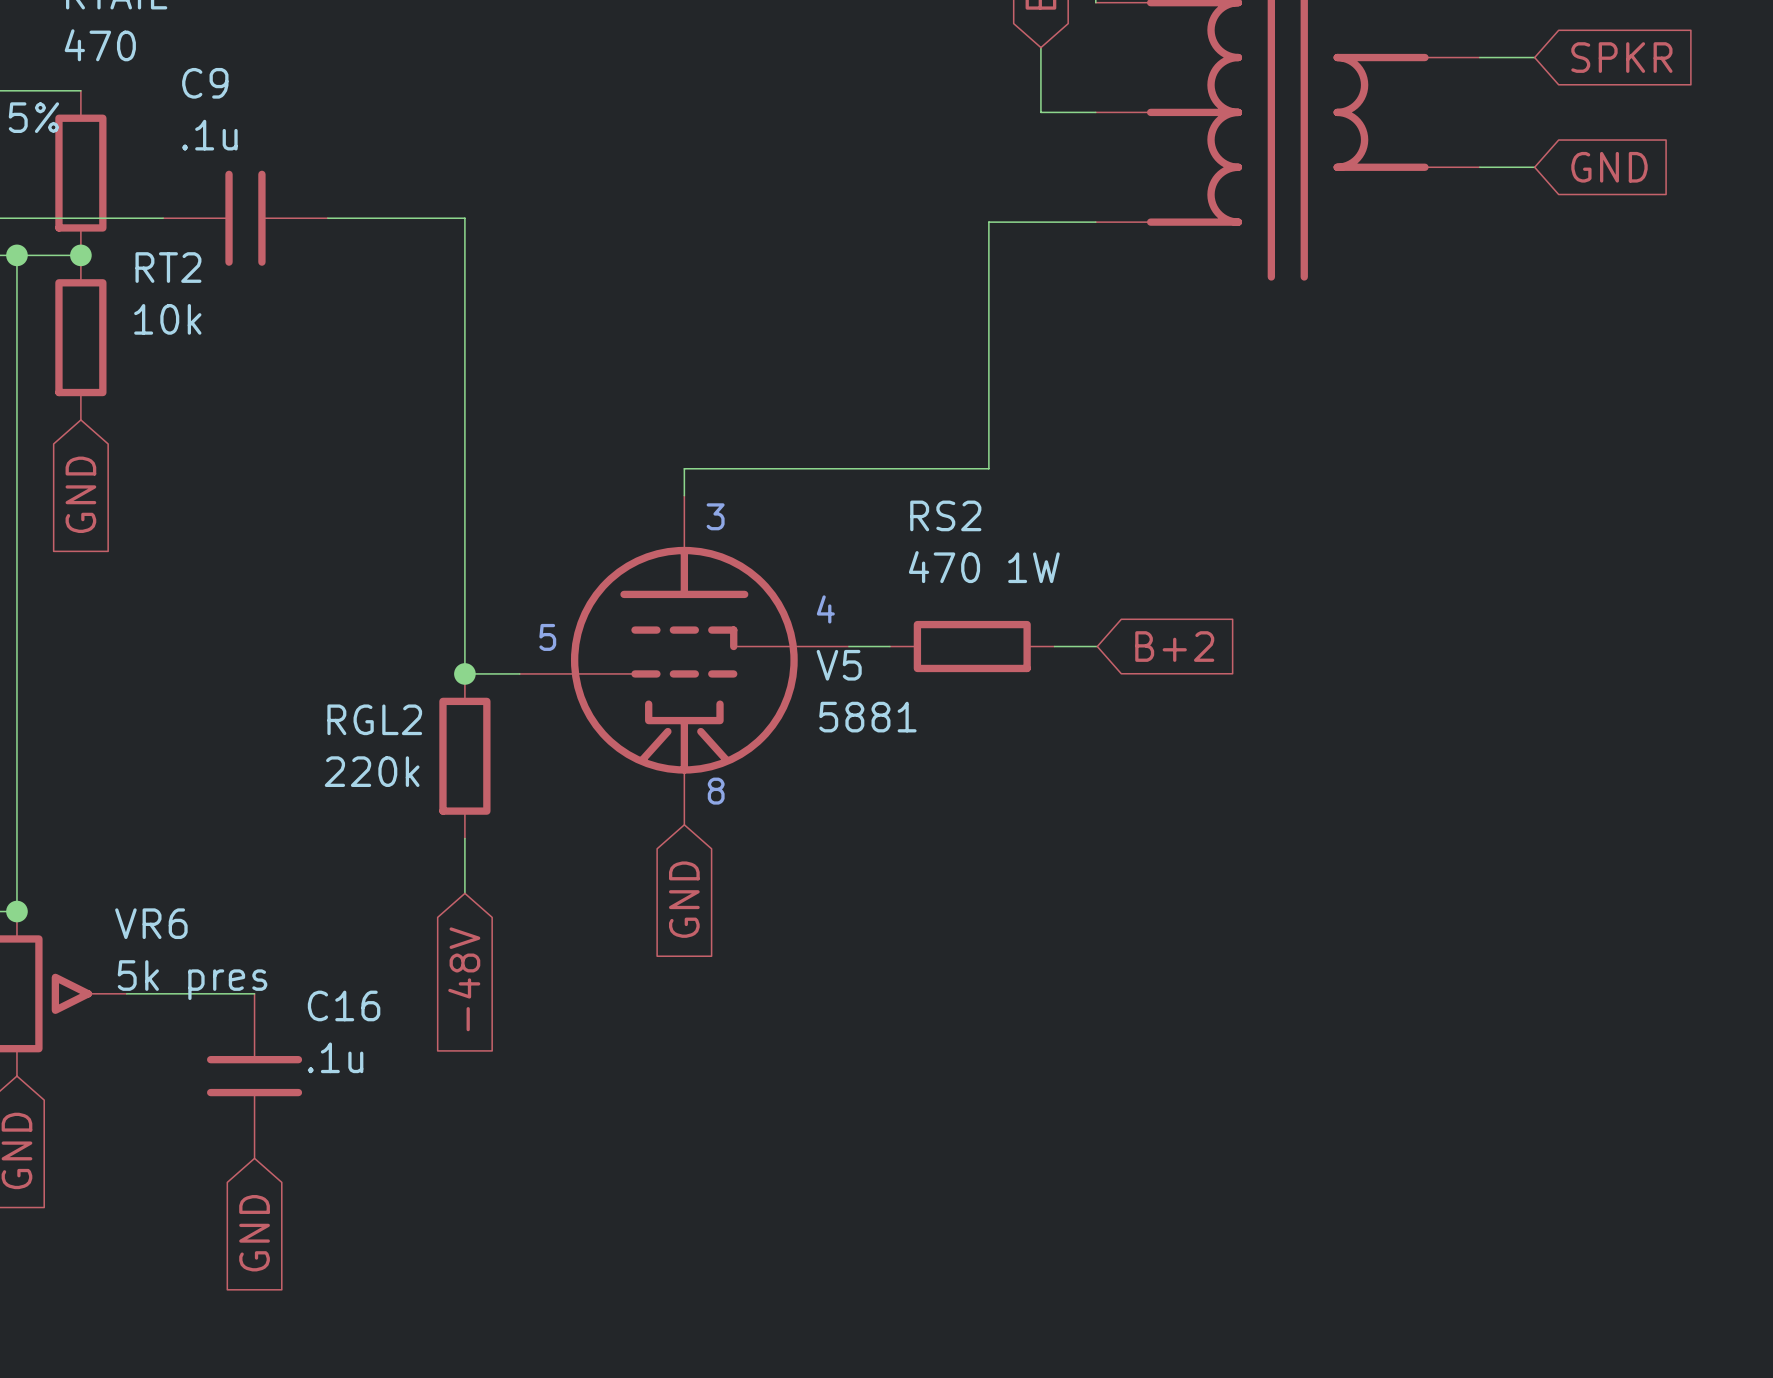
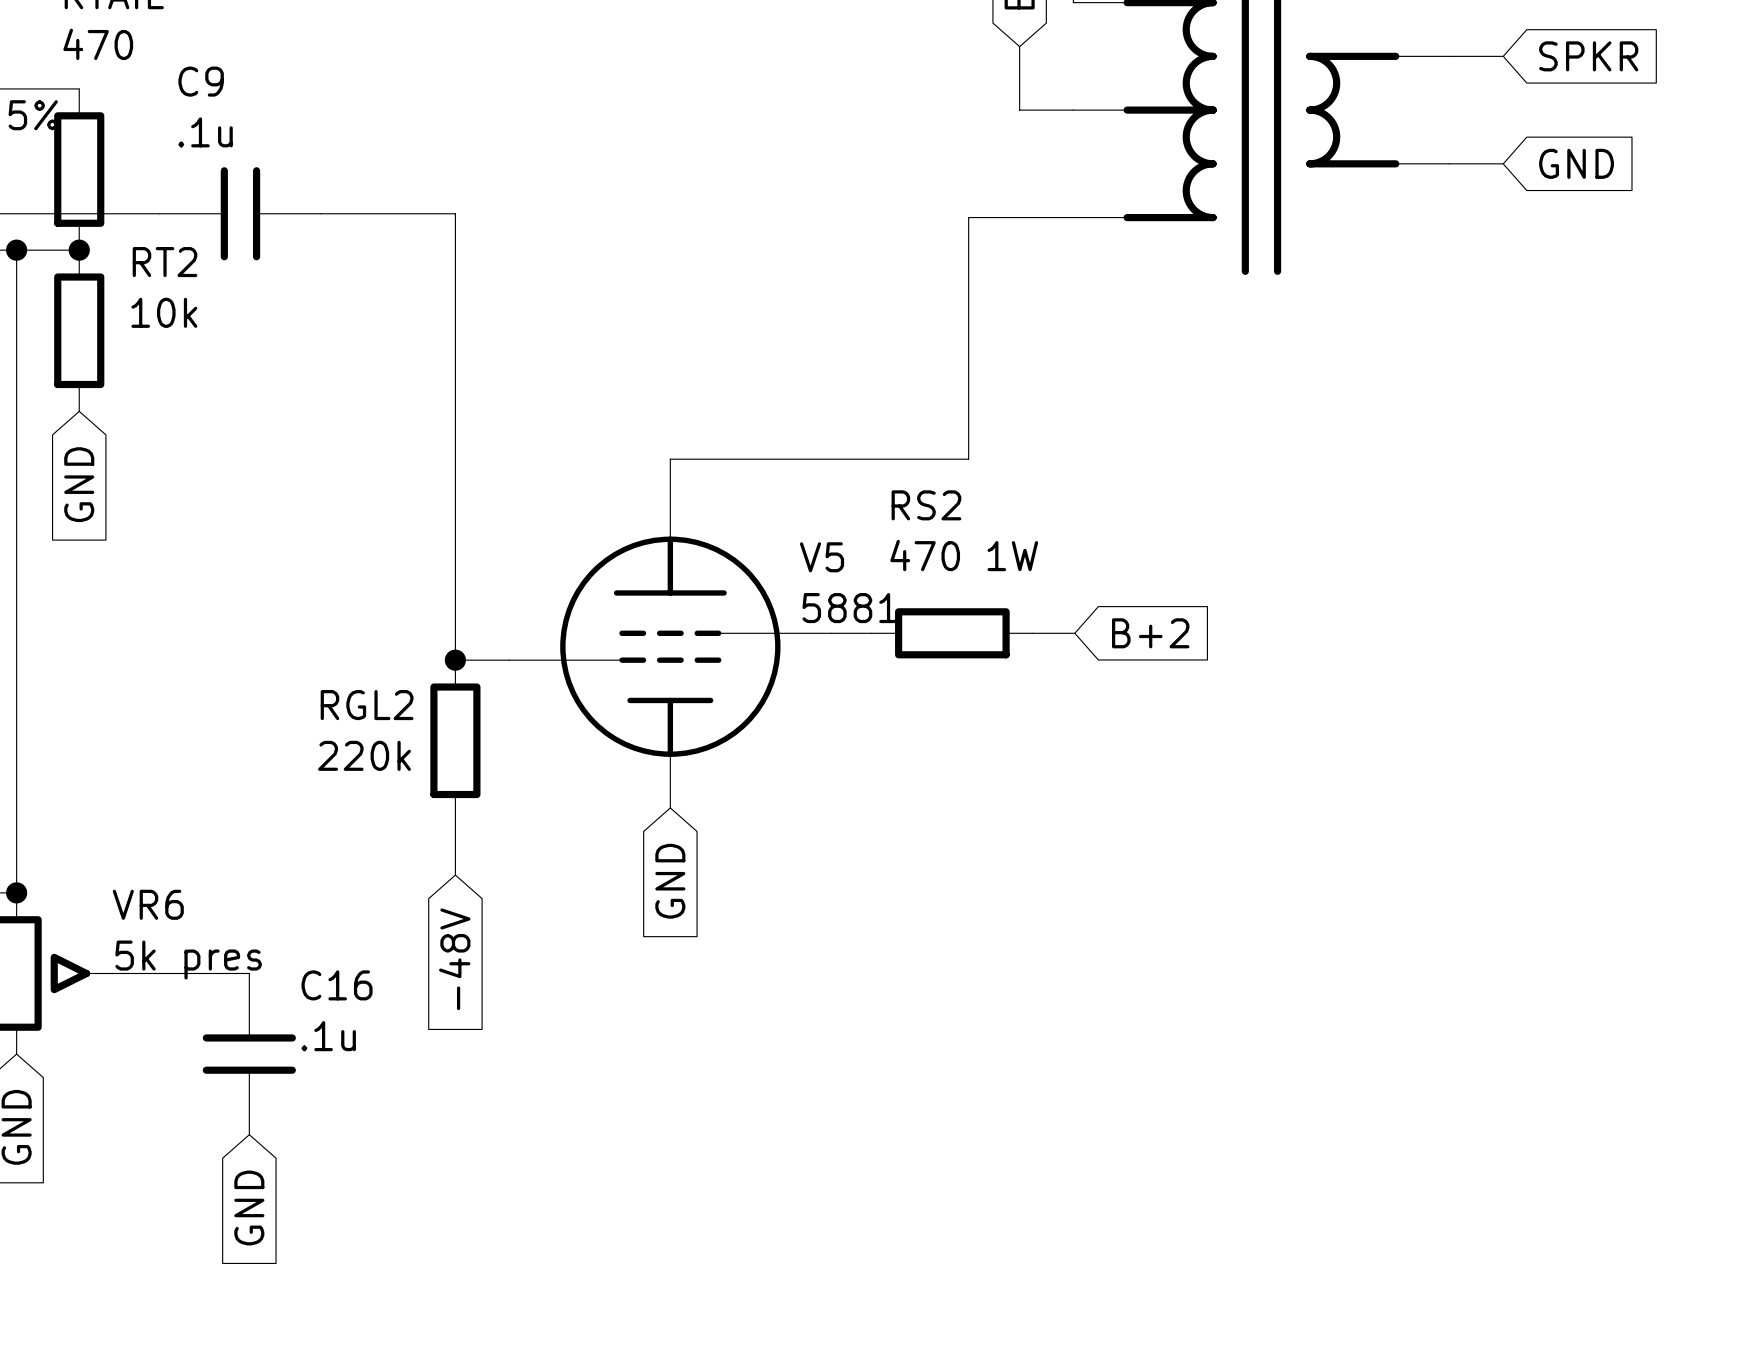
V5 symbol: [519, 495, 849, 825] -> [509, 485, 832, 808]
text: 3 (715, 516) -> none
text: 4 (825, 609) -> none
text: 5 (547, 637) -> none
V5 name position: V5 (839, 665) -> V5 (822, 557)
V5 value position: 5881 (867, 717) -> 5881 (850, 608)
text: 8 (716, 791) -> none

